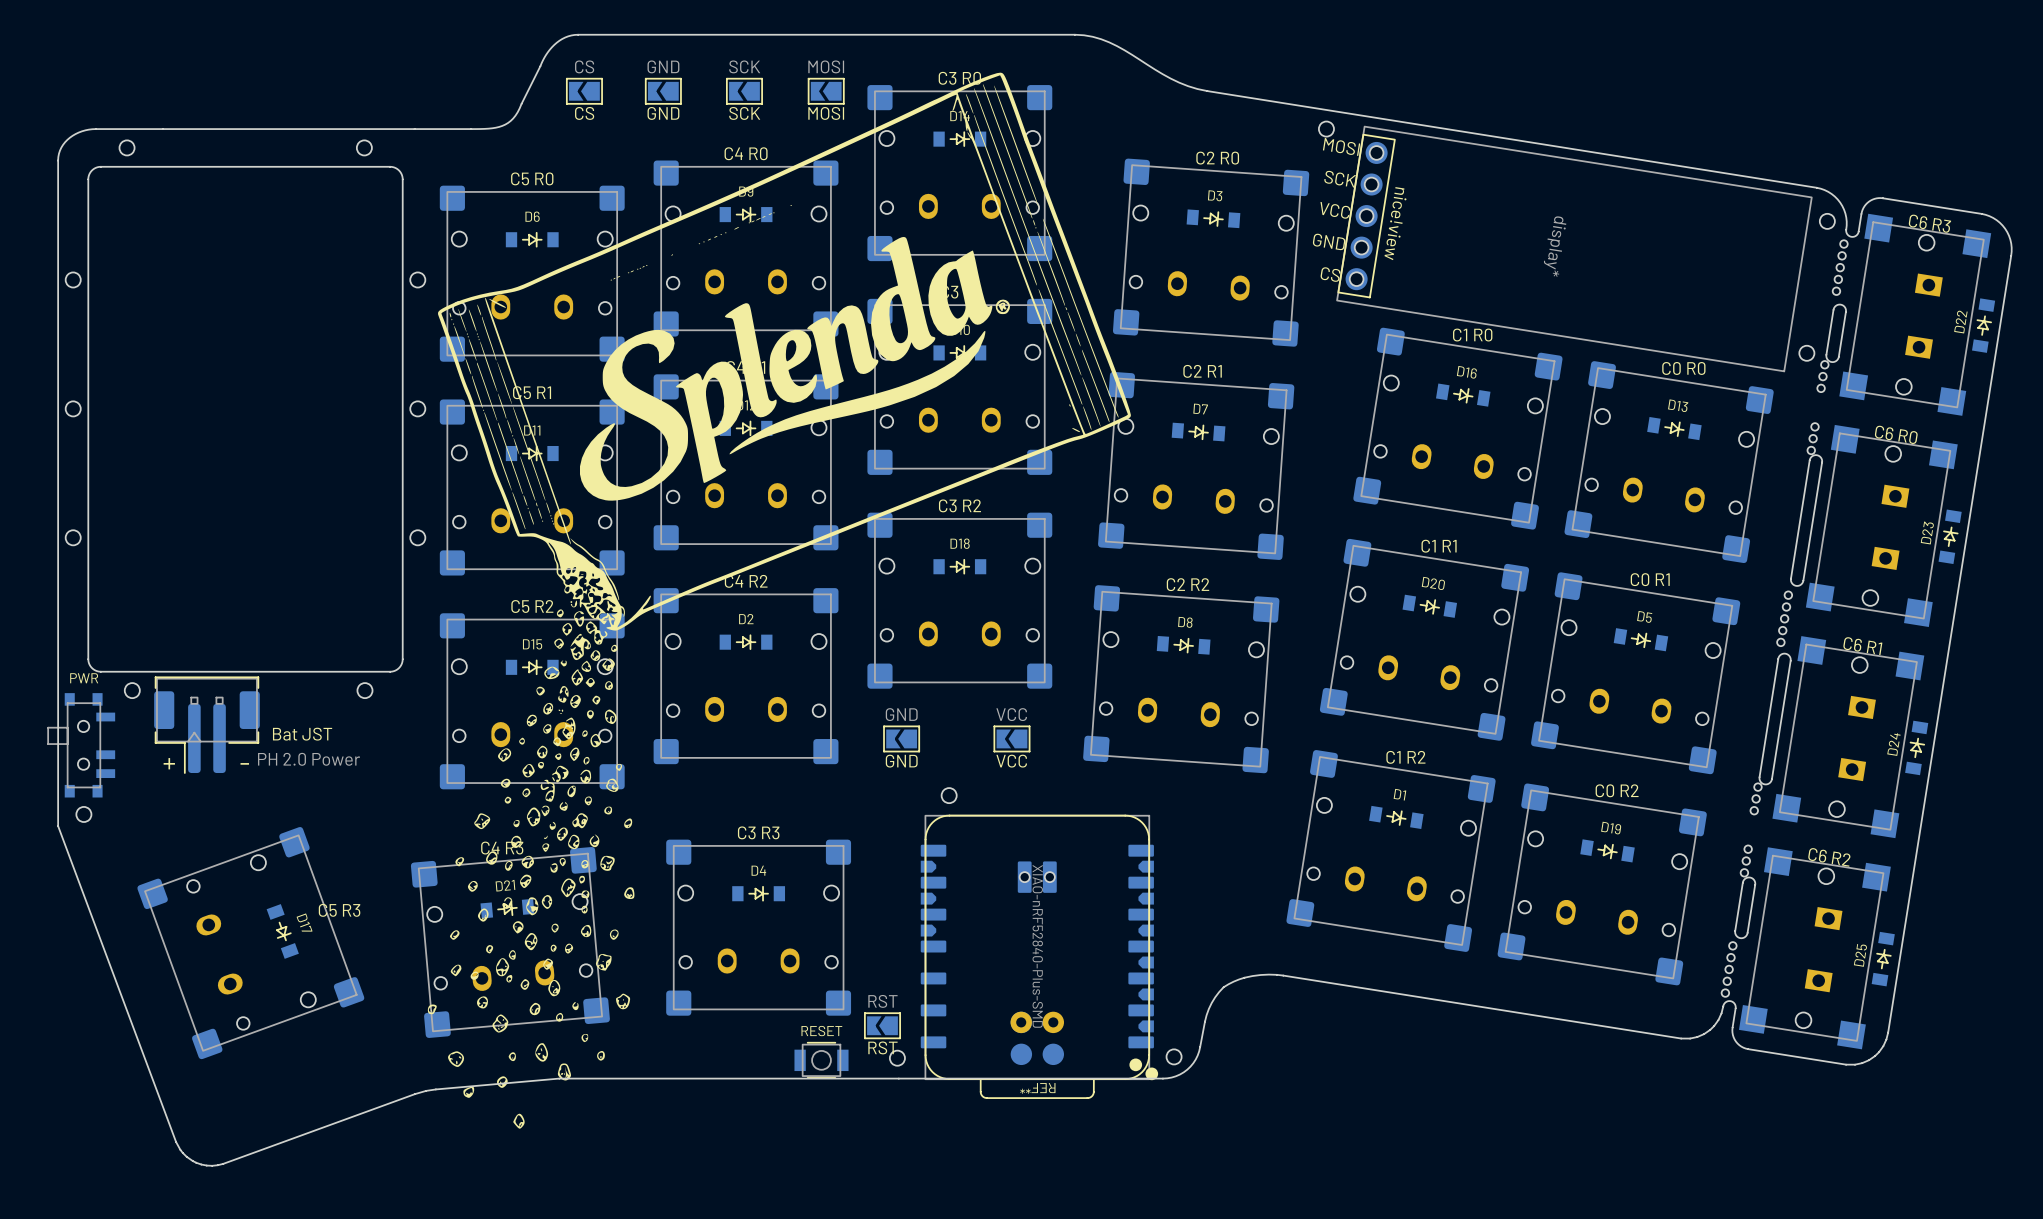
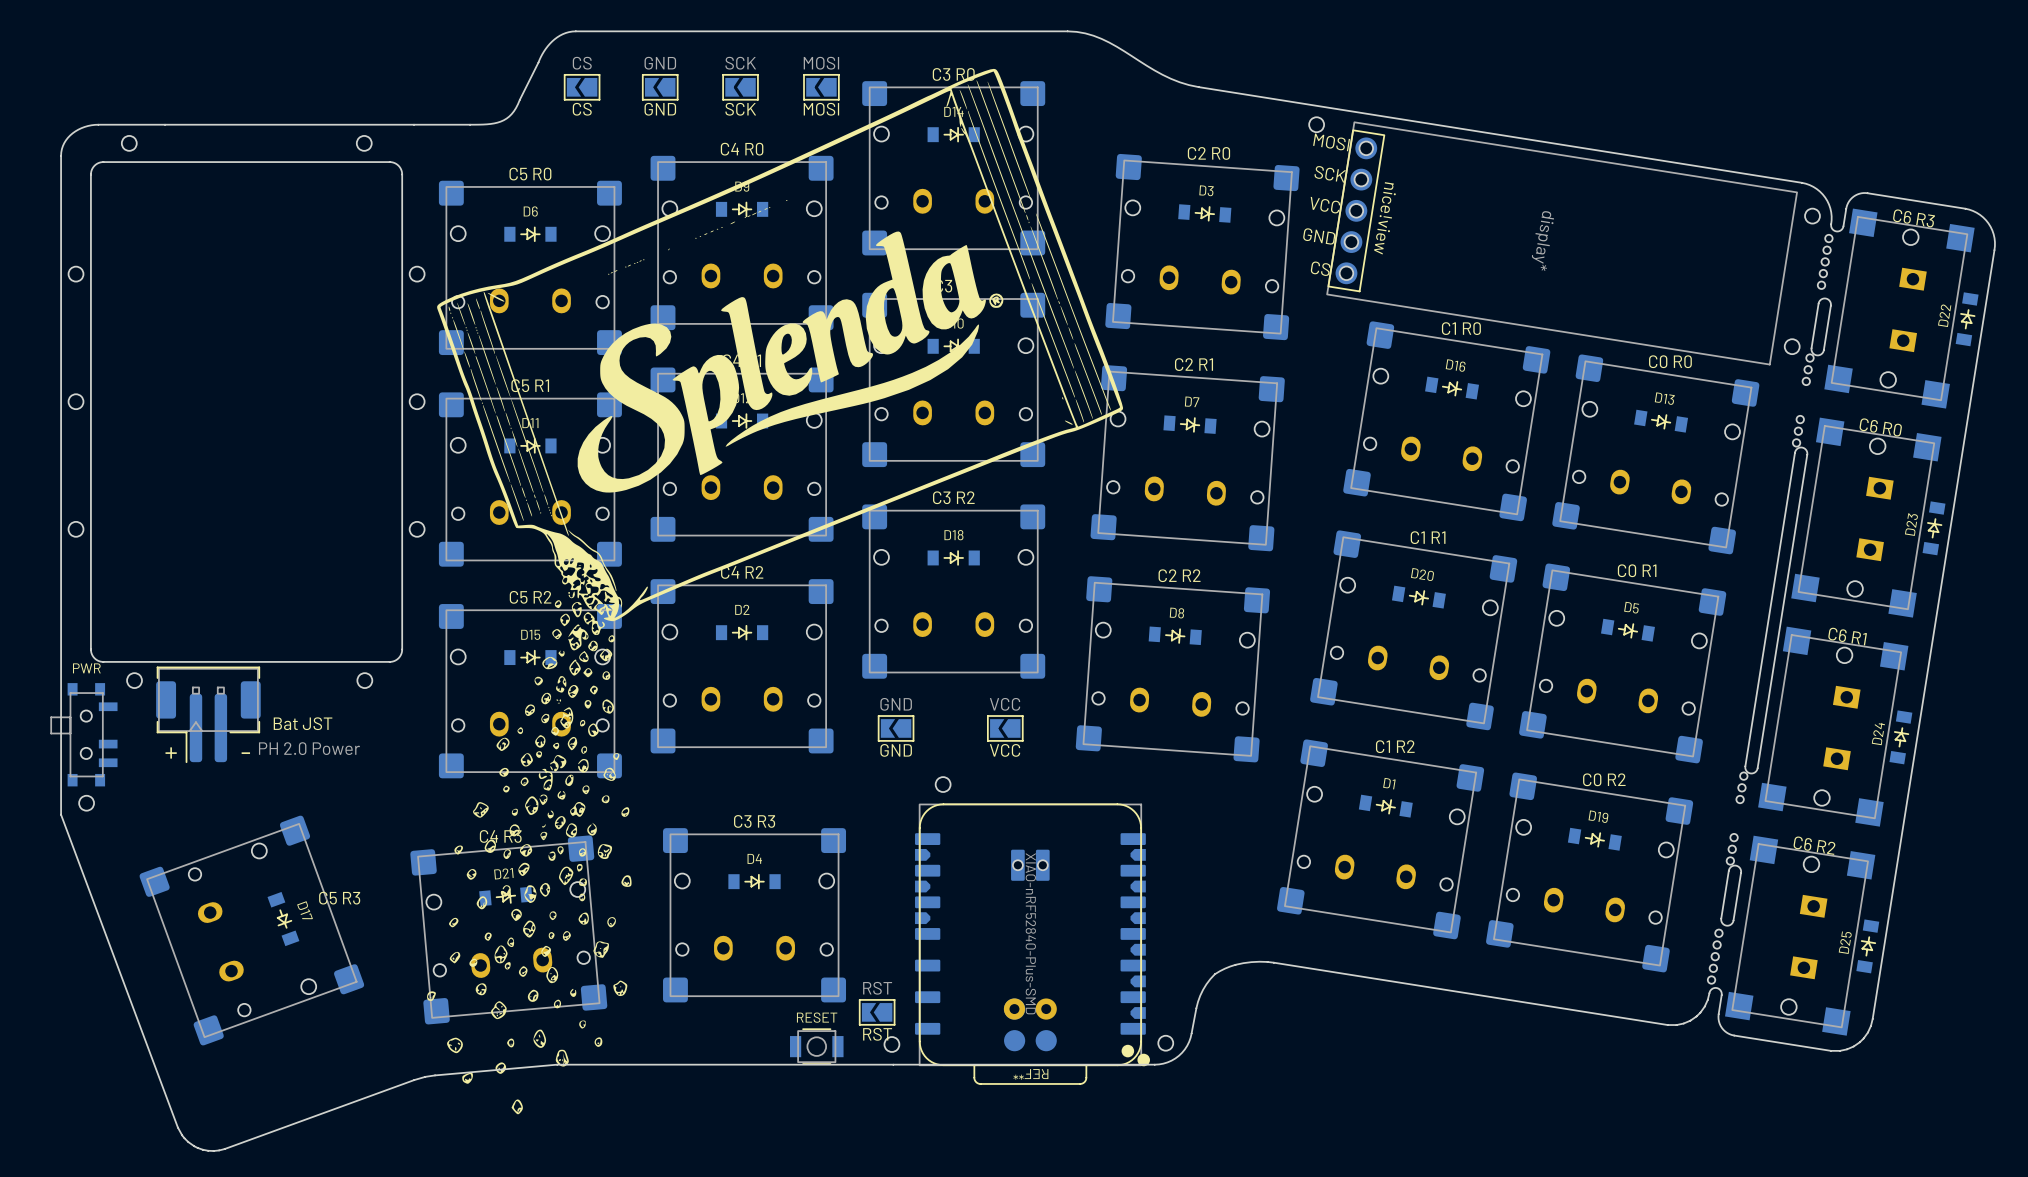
board edge: (1790, 578) (1792, 583) (1796, 585) (1801, 584) (1803, 580) -> (1776, 569) (1763, 649)
part: (1784, 618) -> none
board edge: (1778, 658) (1780, 655) (1785, 653) (1789, 655) (1790, 660) -> (1788, 571) (1776, 651)

